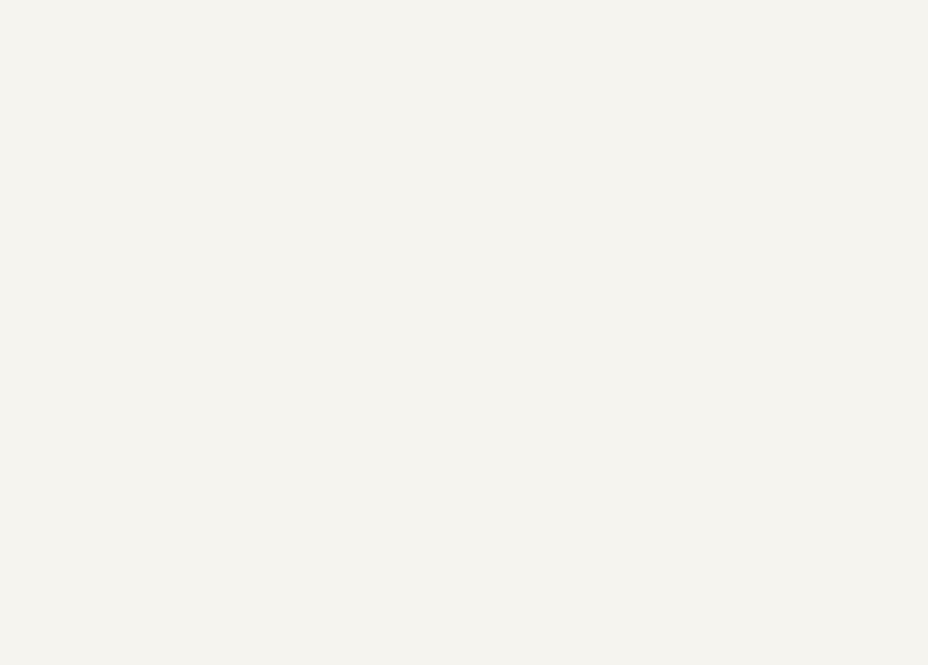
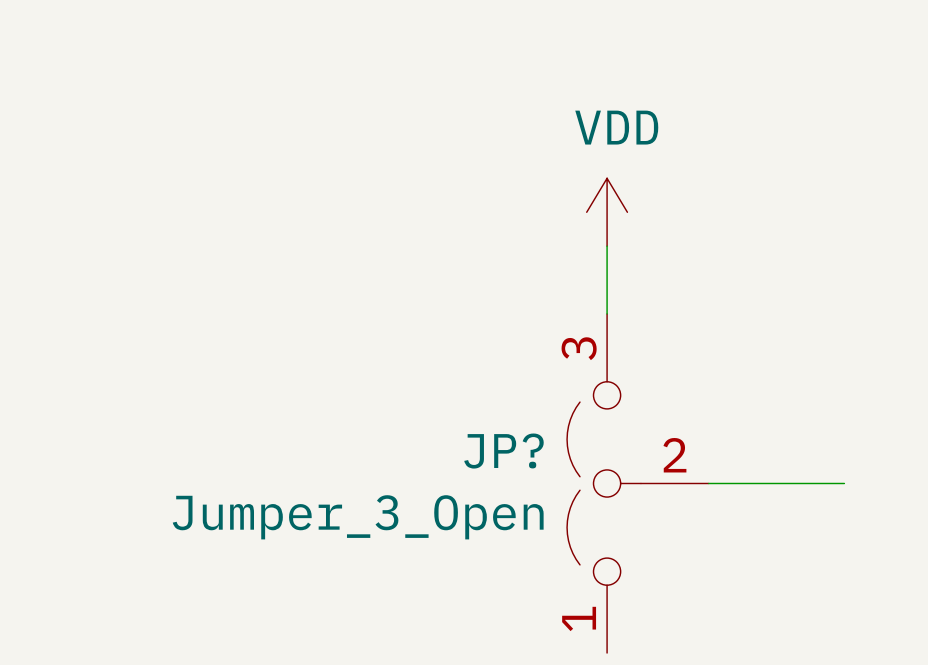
power symbol: none -> VDD (607, 212)
wire: none -> (607, 246) (607, 313)
JP?: none -> Jumper_3_Open (637, 483)
wire: none -> (708, 483) (844, 483)

